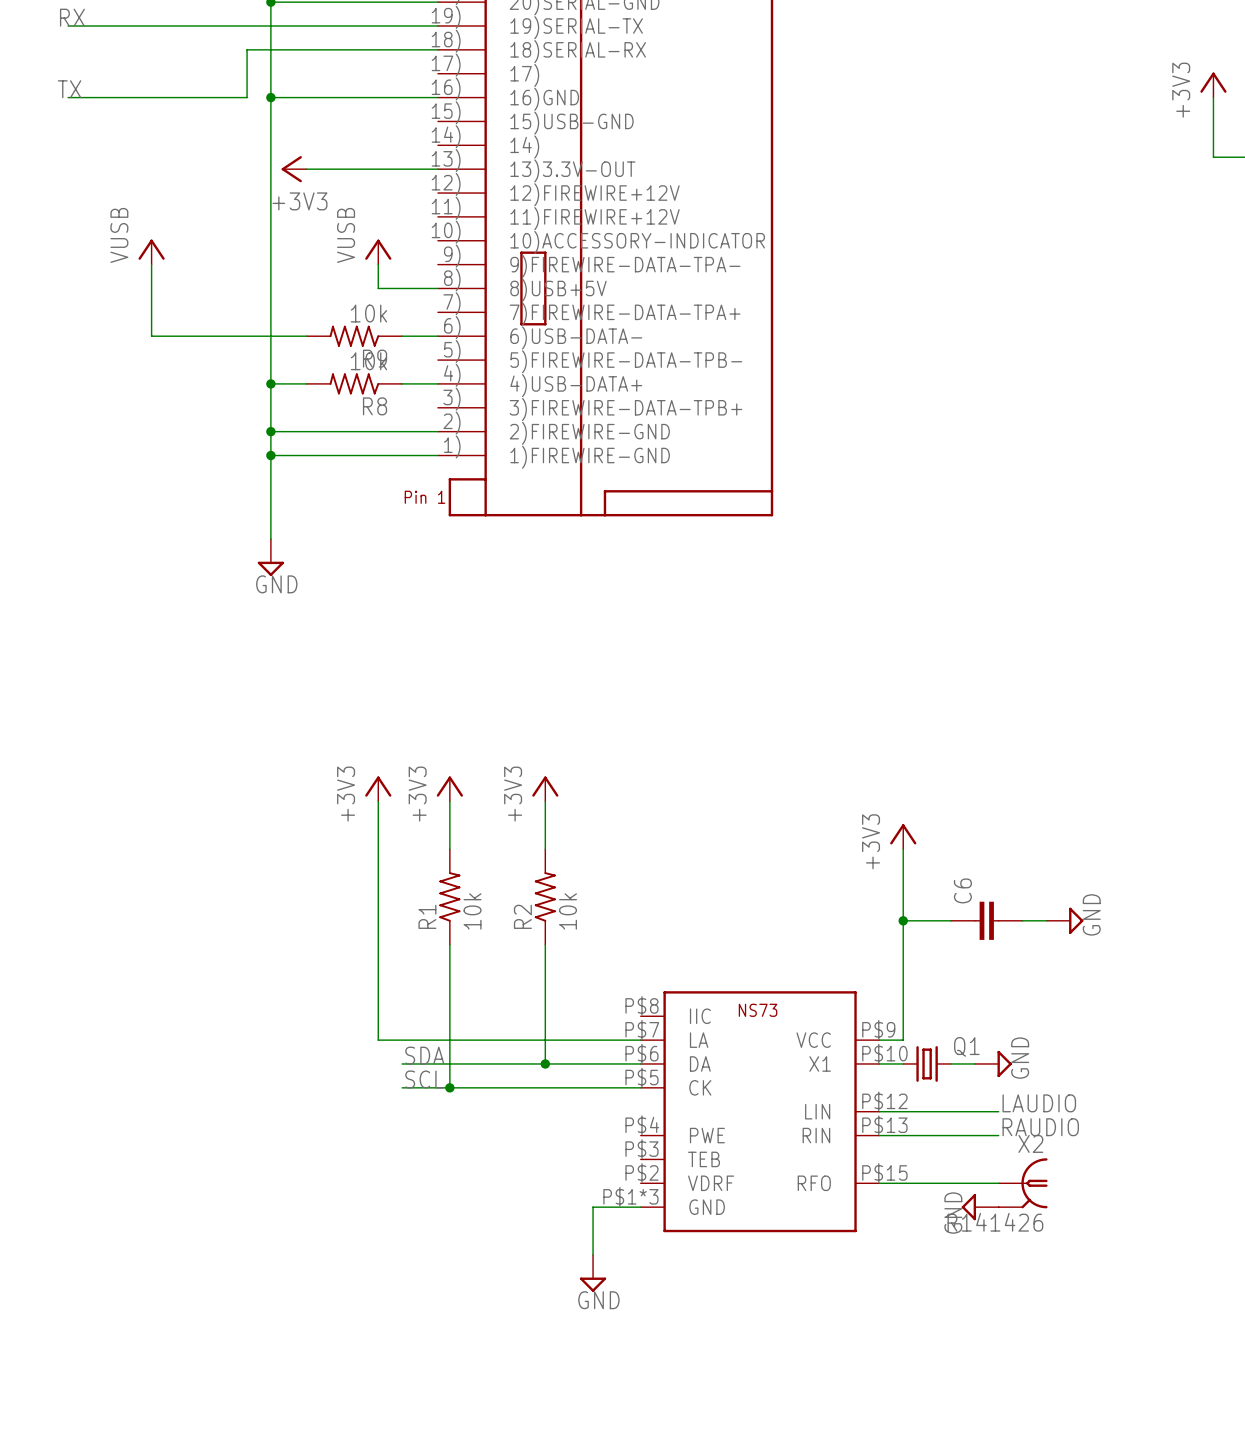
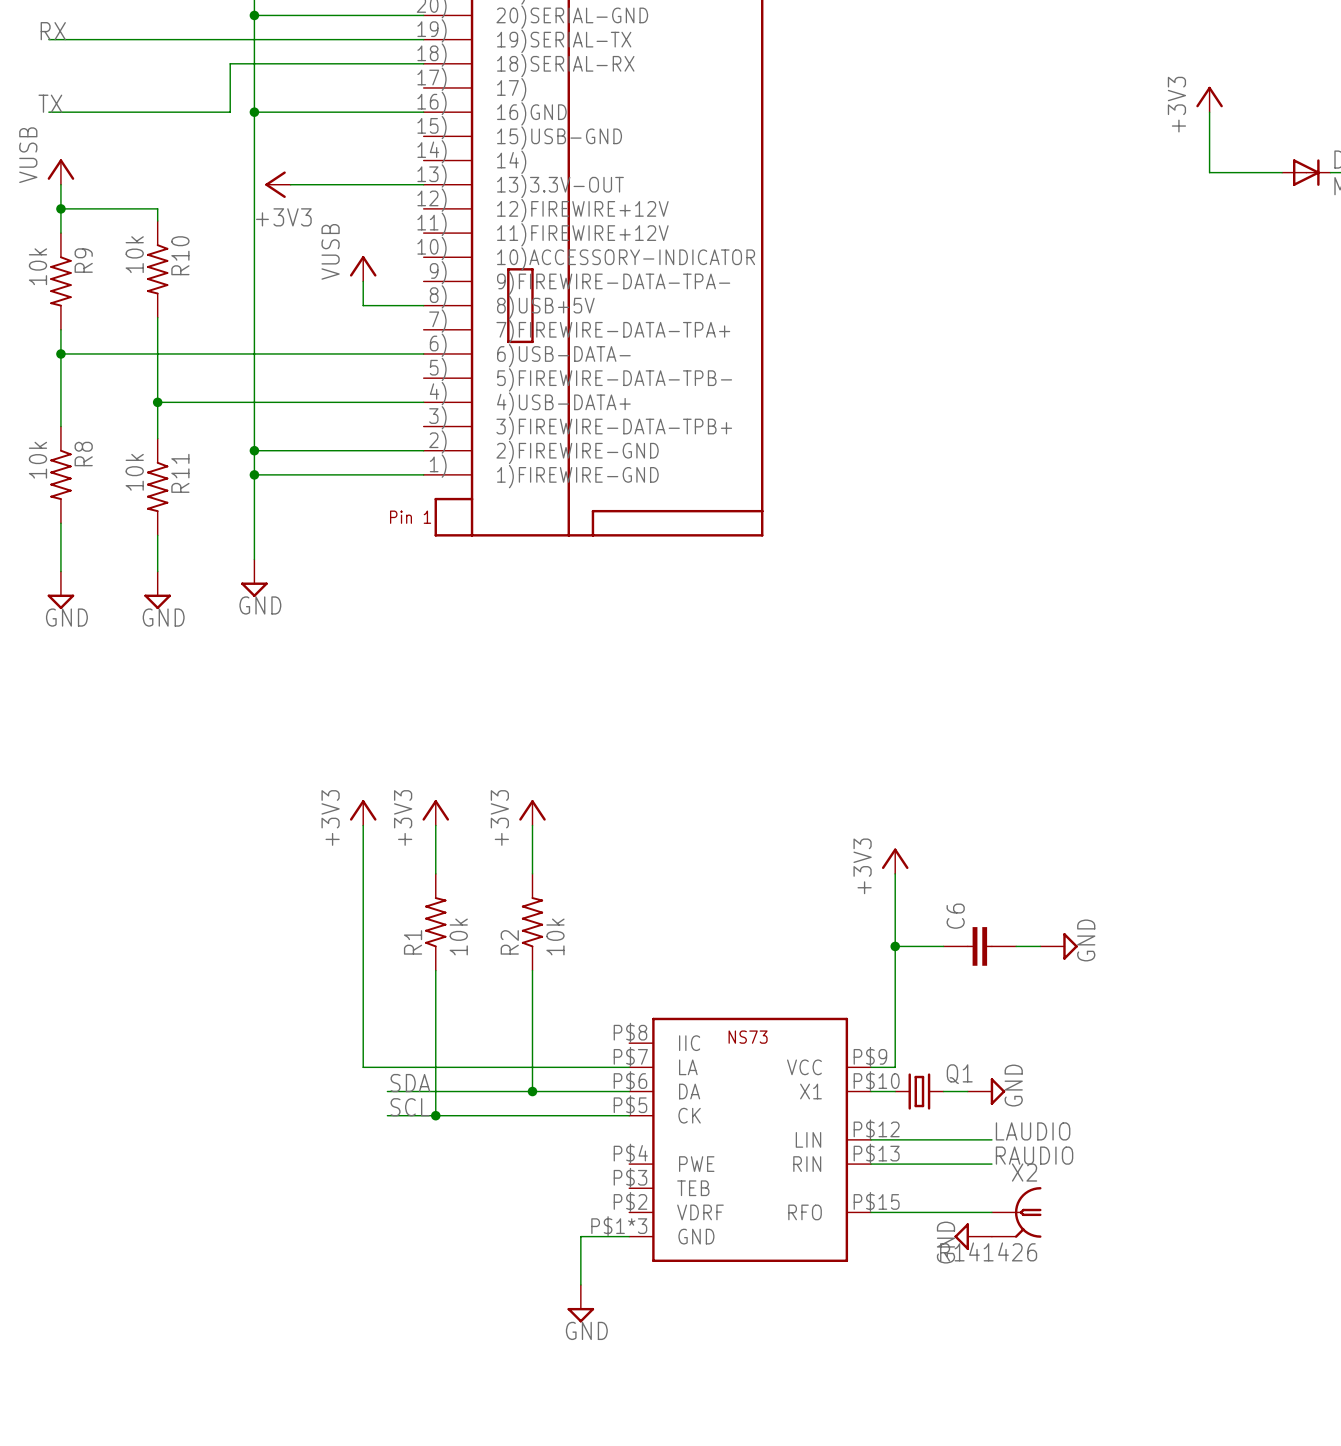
wire: none -> (60, 184) (60, 233)
wire: none -> (60, 208) (157, 208) (157, 220)
junction: none -> (60, 208)
power symbol position: VUSB (151, 252) -> VUSB (60, 172)
R10: none -> 10k (157, 269)
wire: (151, 264) (151, 336) -> (60, 353) (133, 353)
wire: none -> (157, 317) (157, 438)
wire: none -> (60, 329) (60, 426)
junction: none -> (60, 353)
R9 rotation: 0° (354, 336) -> 90° counterclockwise (60, 281)
R9 position: (354, 336) -> (60, 281)
wire: none -> (157, 402) (254, 402)
junction: none -> (157, 402)
junction: (270, 383) -> none
R8 rotation: 0° (354, 383) -> 90° counterclockwise (60, 474)
R8 position: (354, 383) -> (60, 474)
R11: none -> 10k (157, 486)
wire: none -> (60, 523) (60, 571)
wire: none -> (157, 535) (157, 571)
power symbol: none -> GND (60, 590)
power symbol: none -> GND (157, 590)

